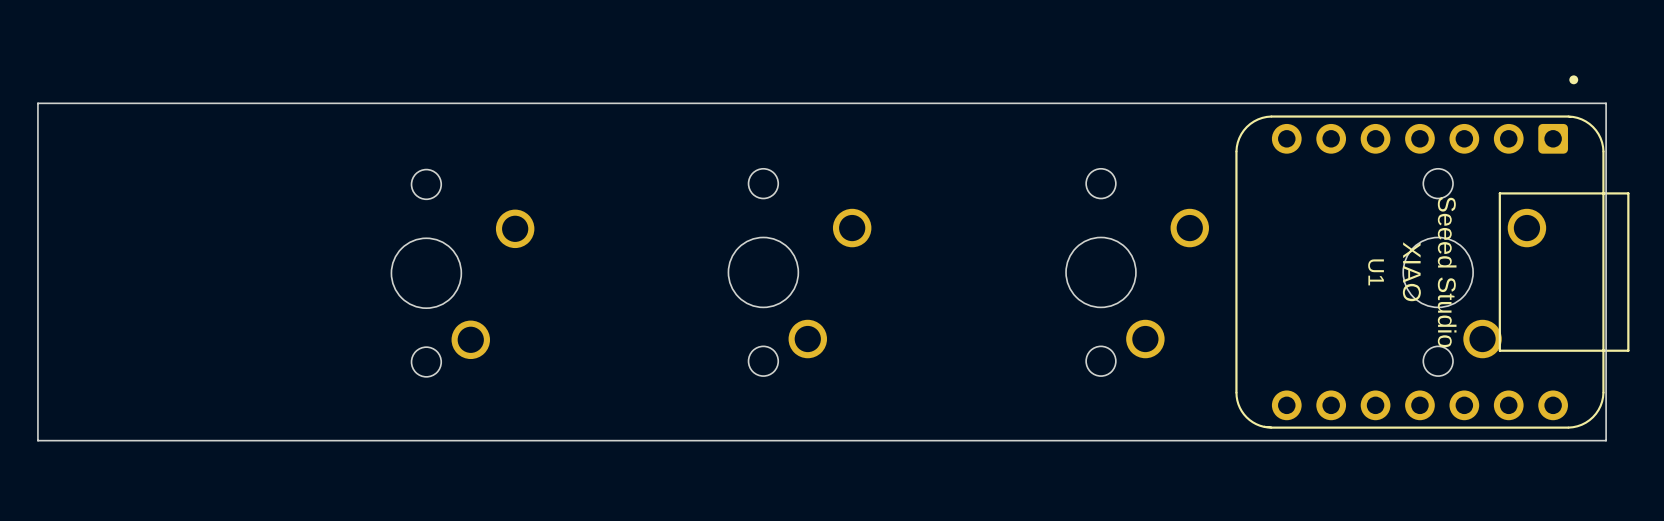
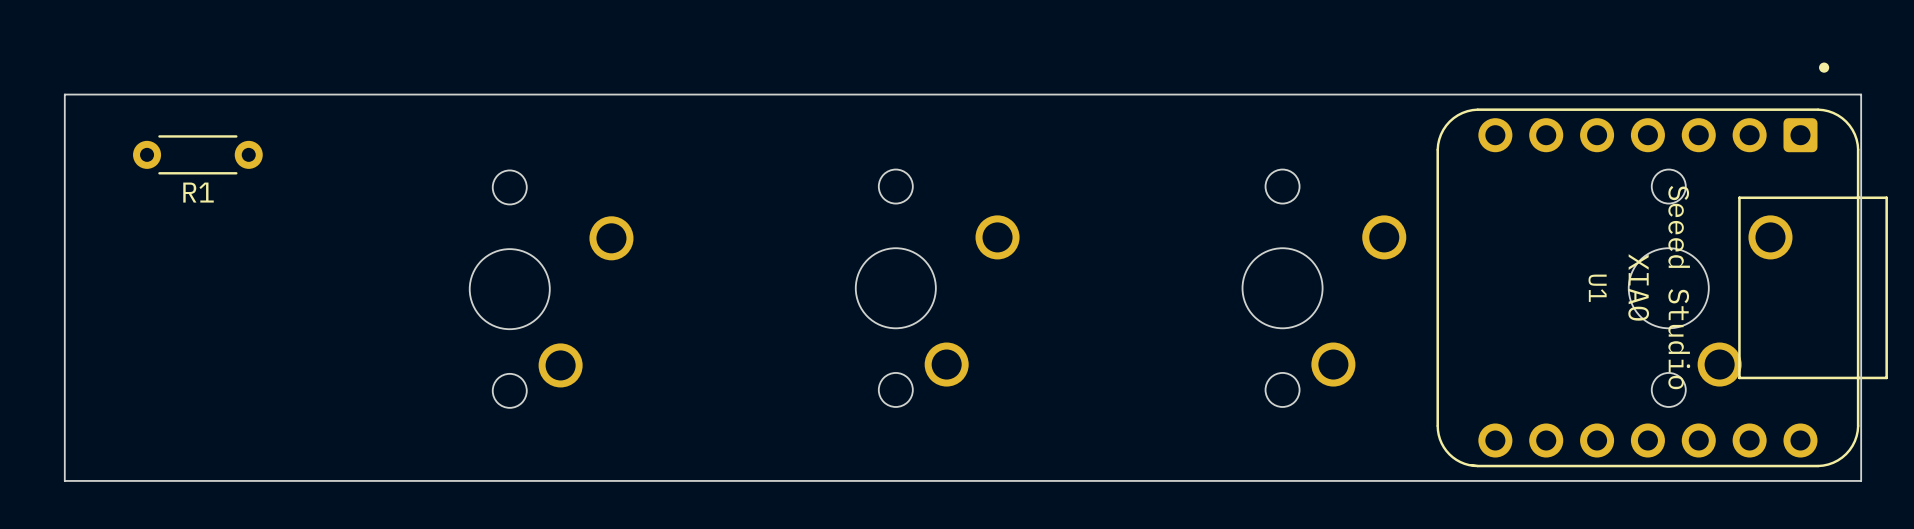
R1: none -> (197, 154)

